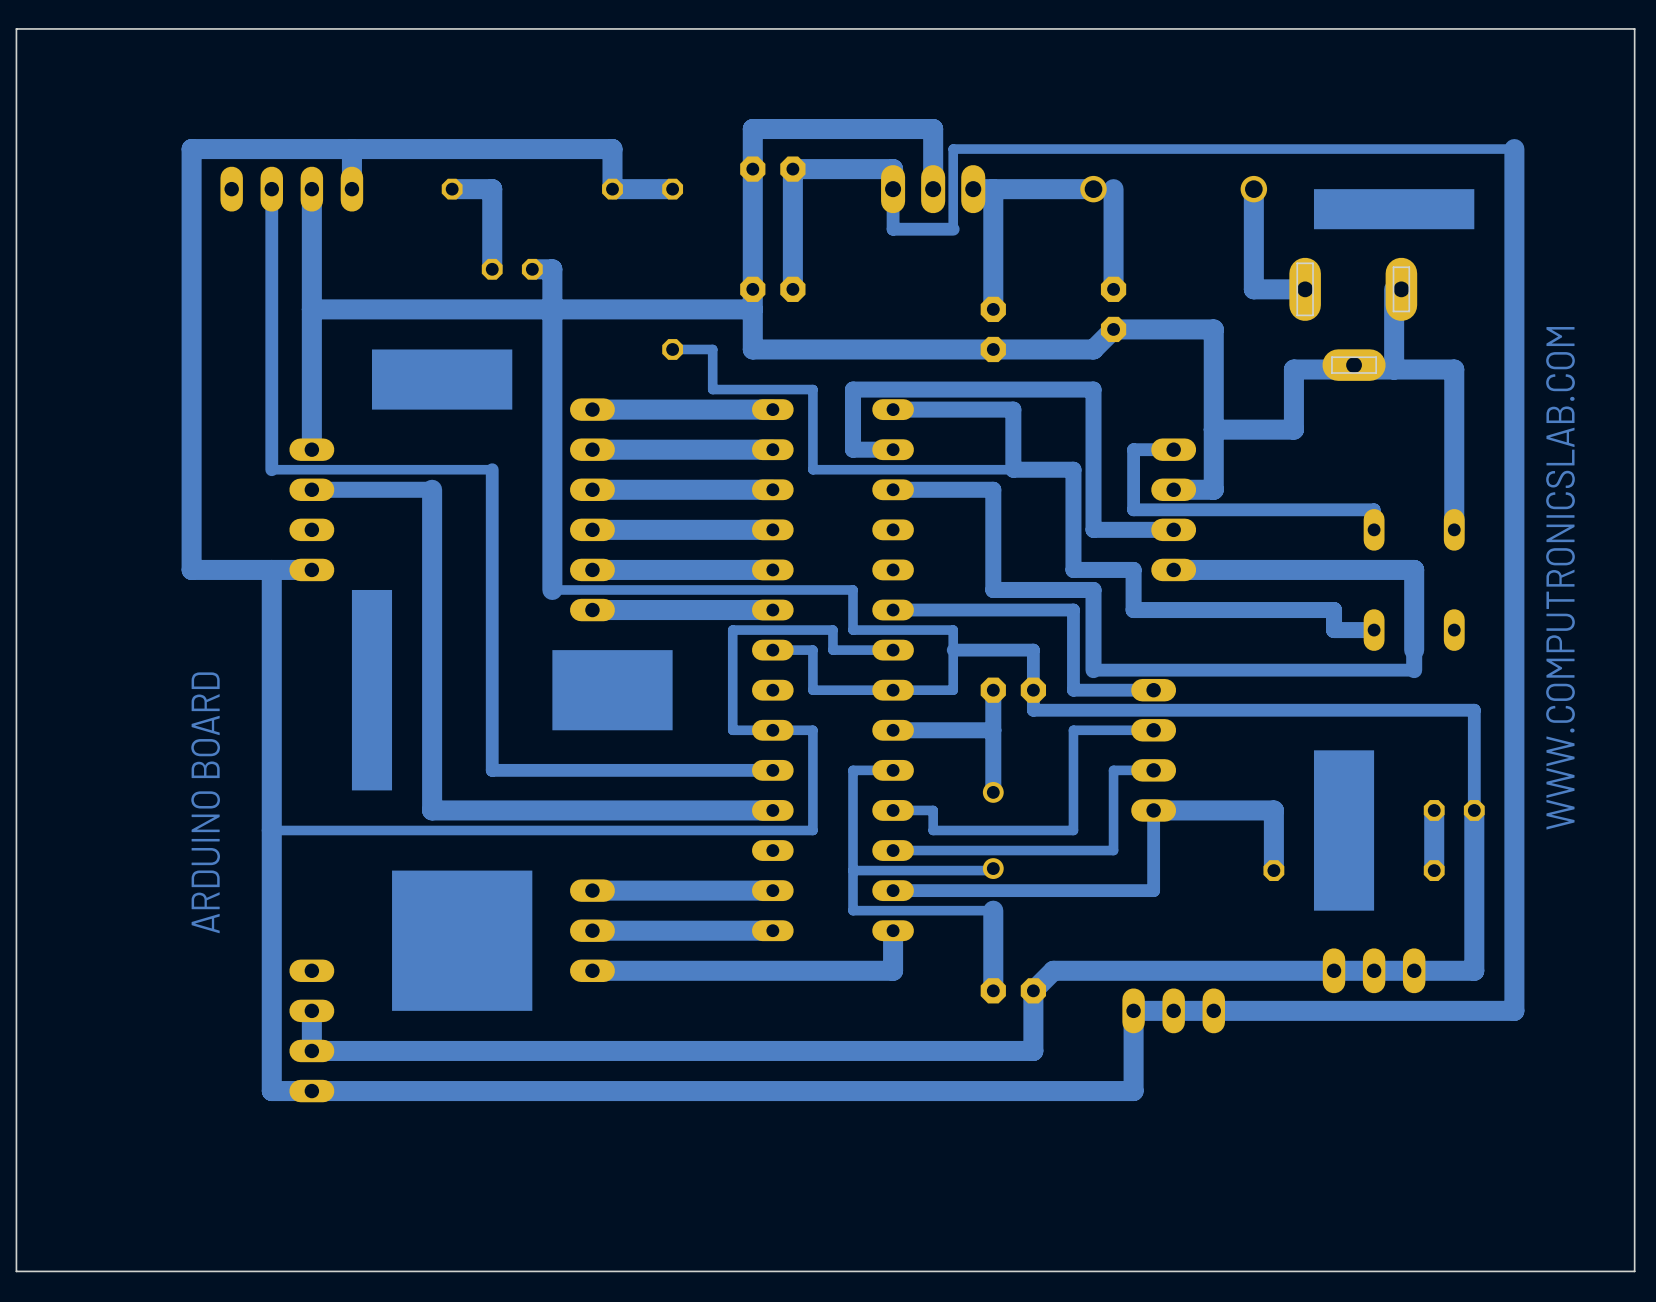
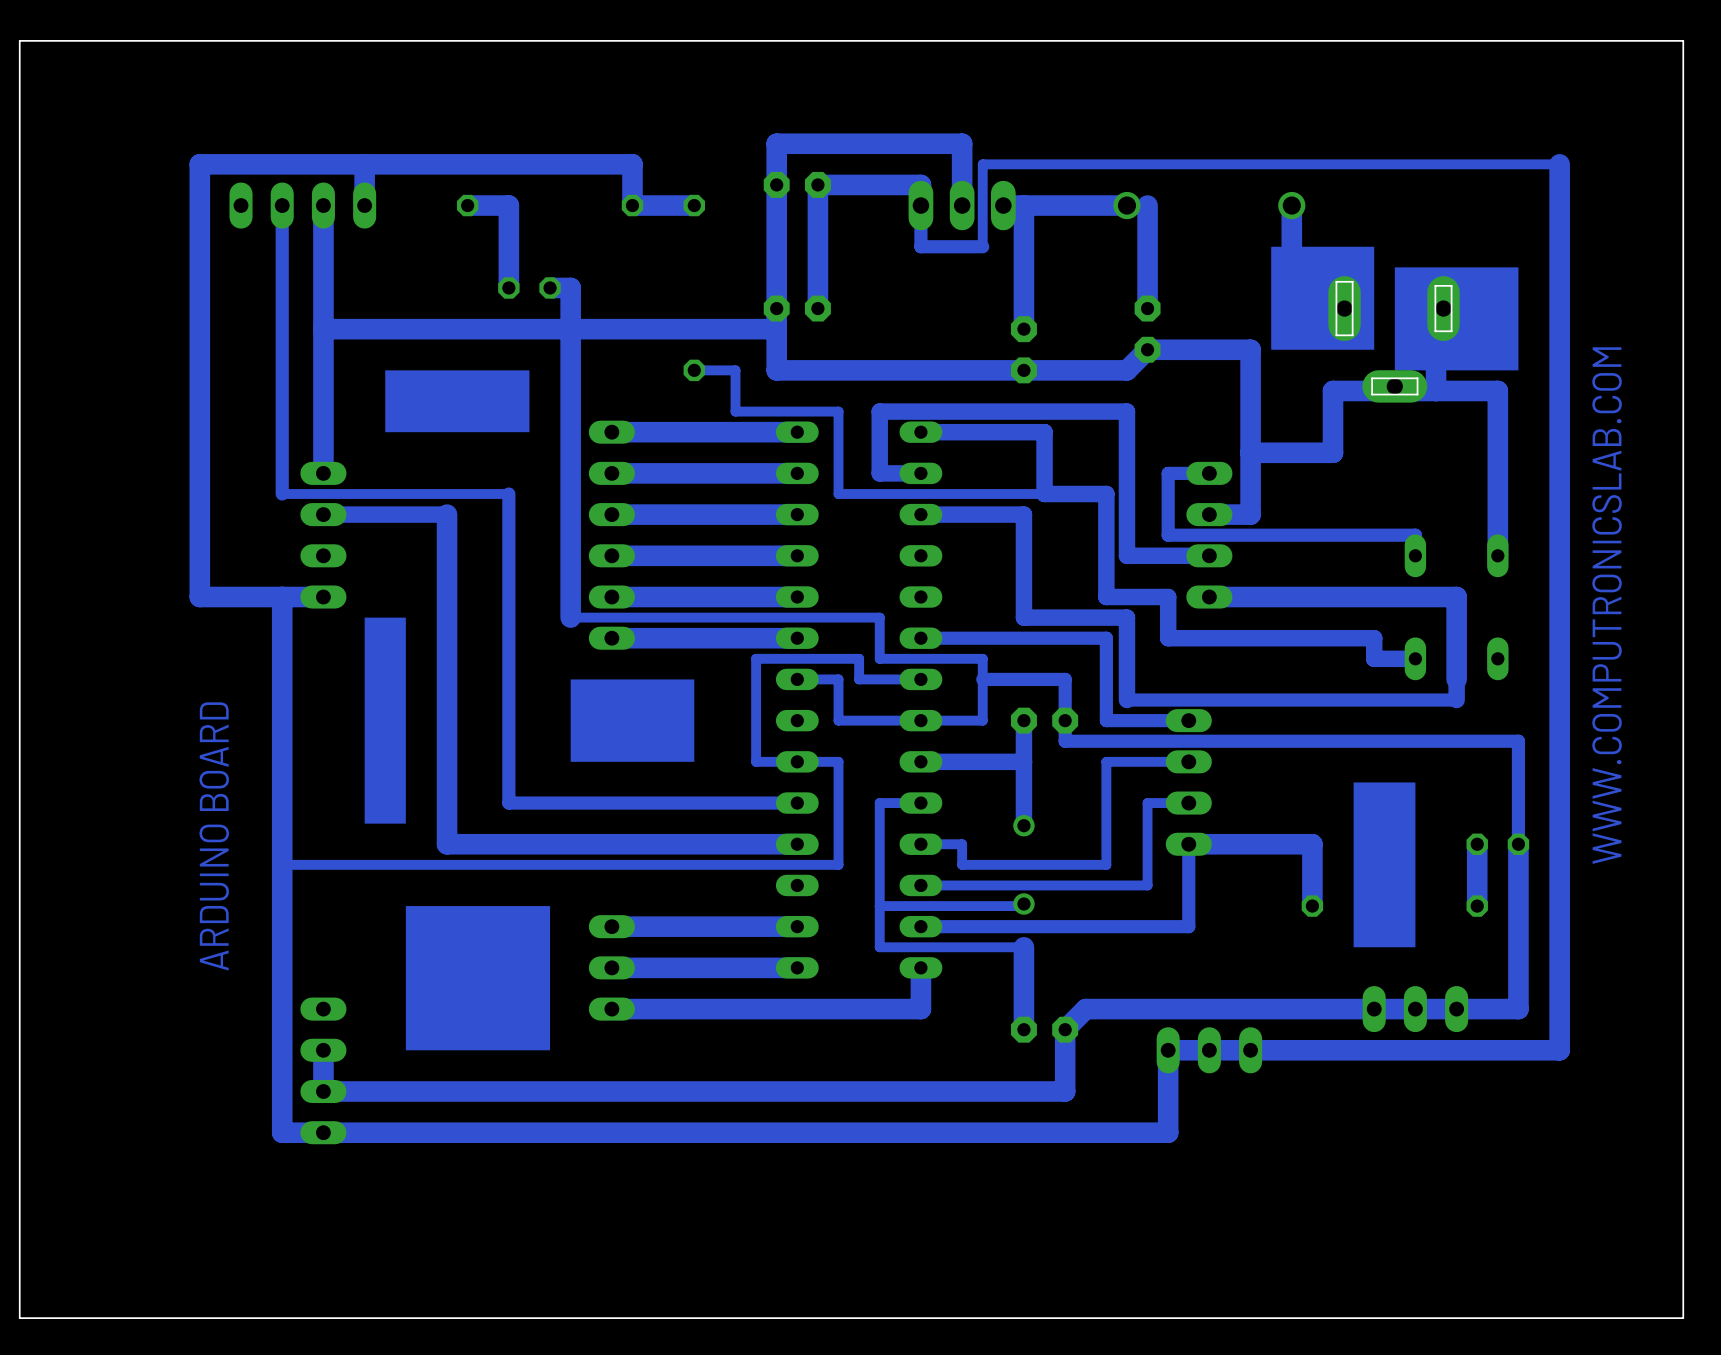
drawing: [1313, 189, 1475, 230] -> none
drawing: none -> [1271, 246, 1375, 350]
drawing: none -> [1394, 267, 1519, 371]

